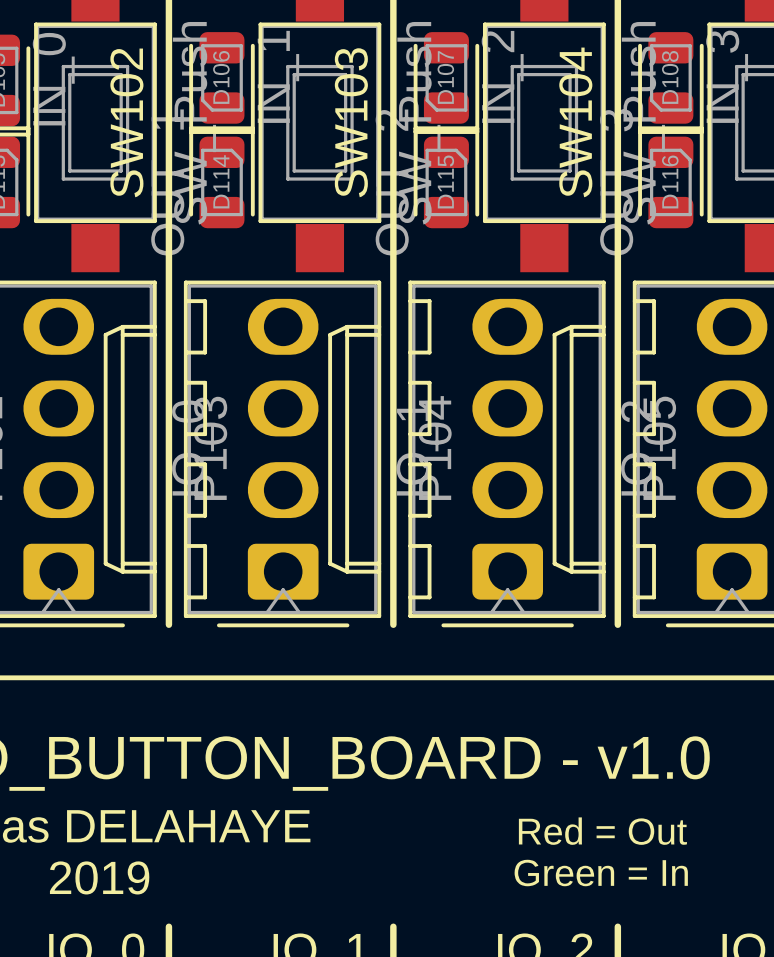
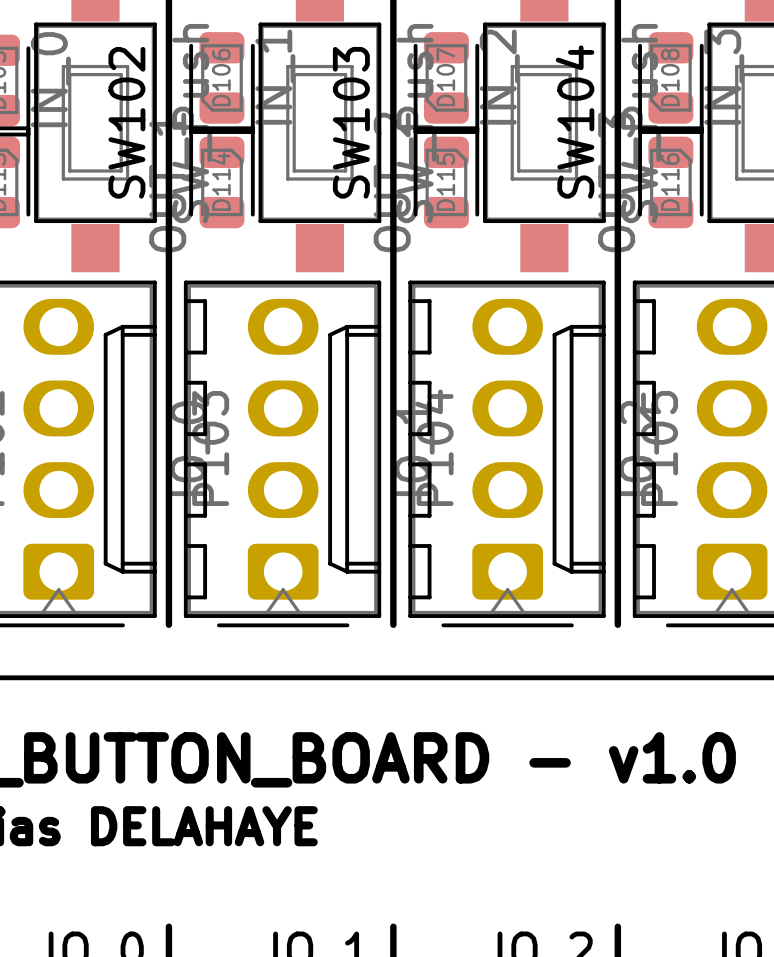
text: Red = Out (602, 831) -> none
text: Green = In (601, 873) -> none
text: 2019 (99, 877) -> none

